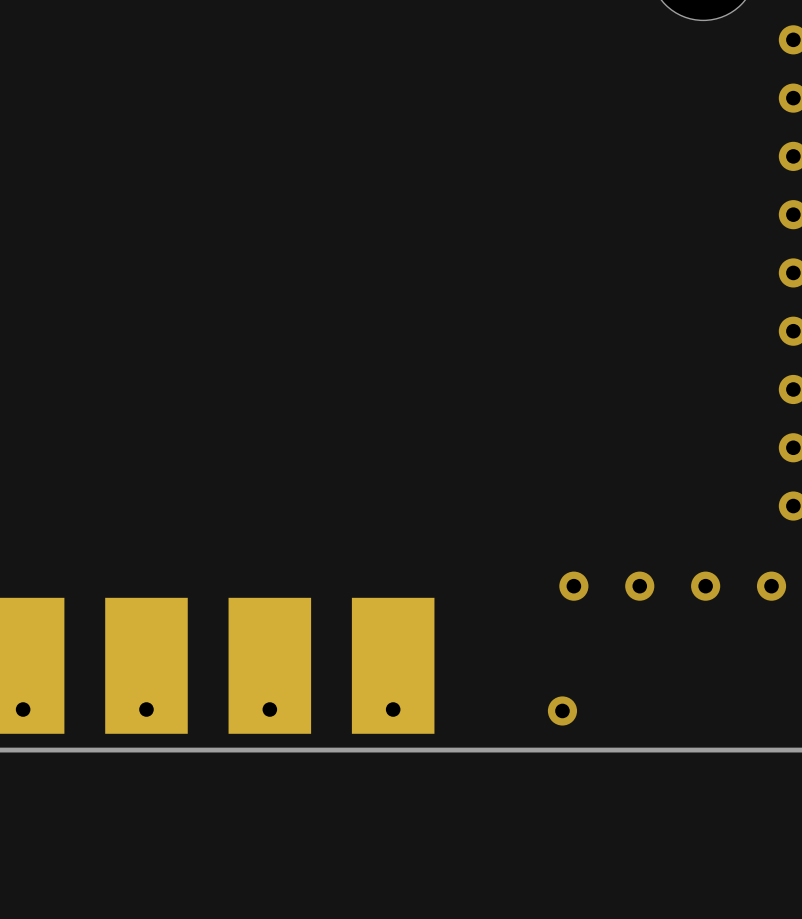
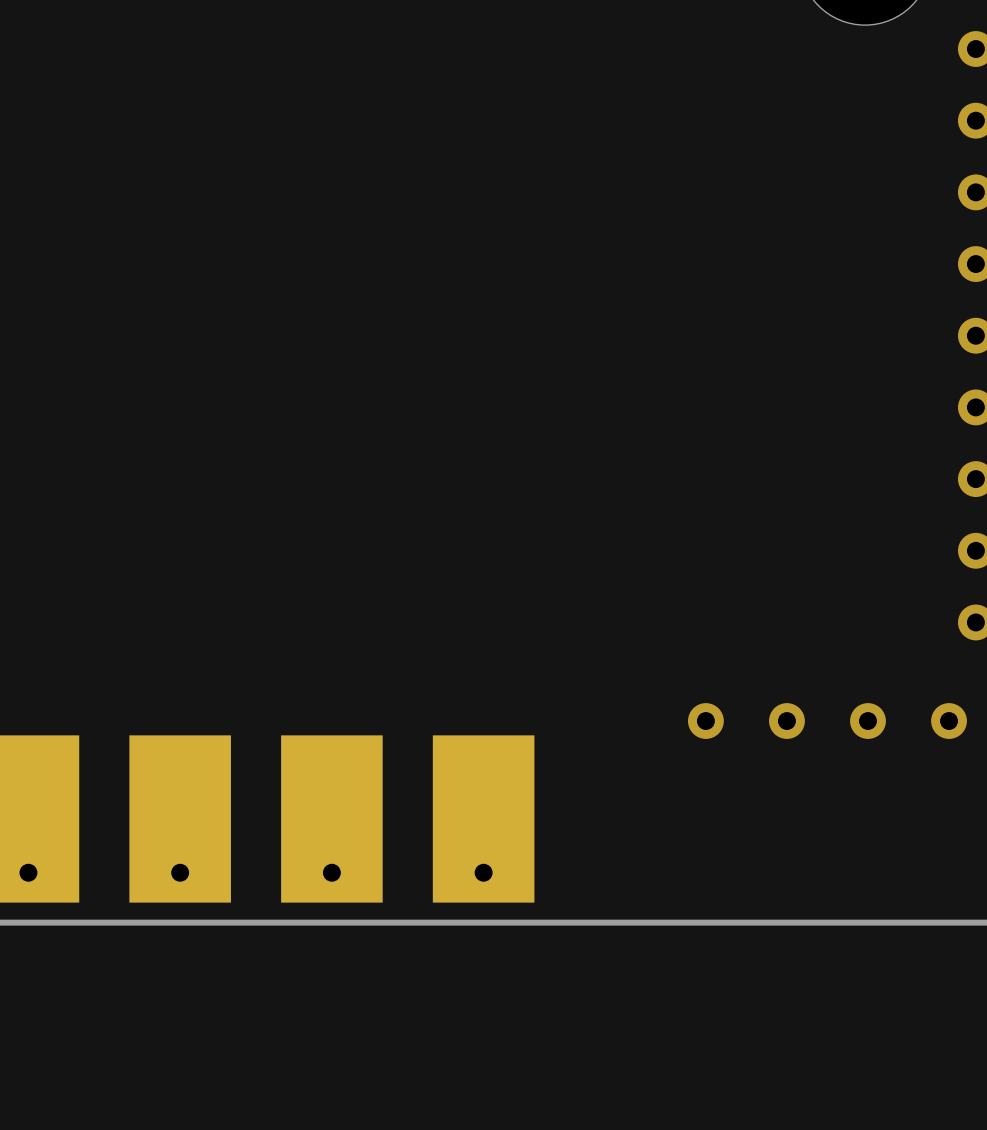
via: (562, 710) -> none

